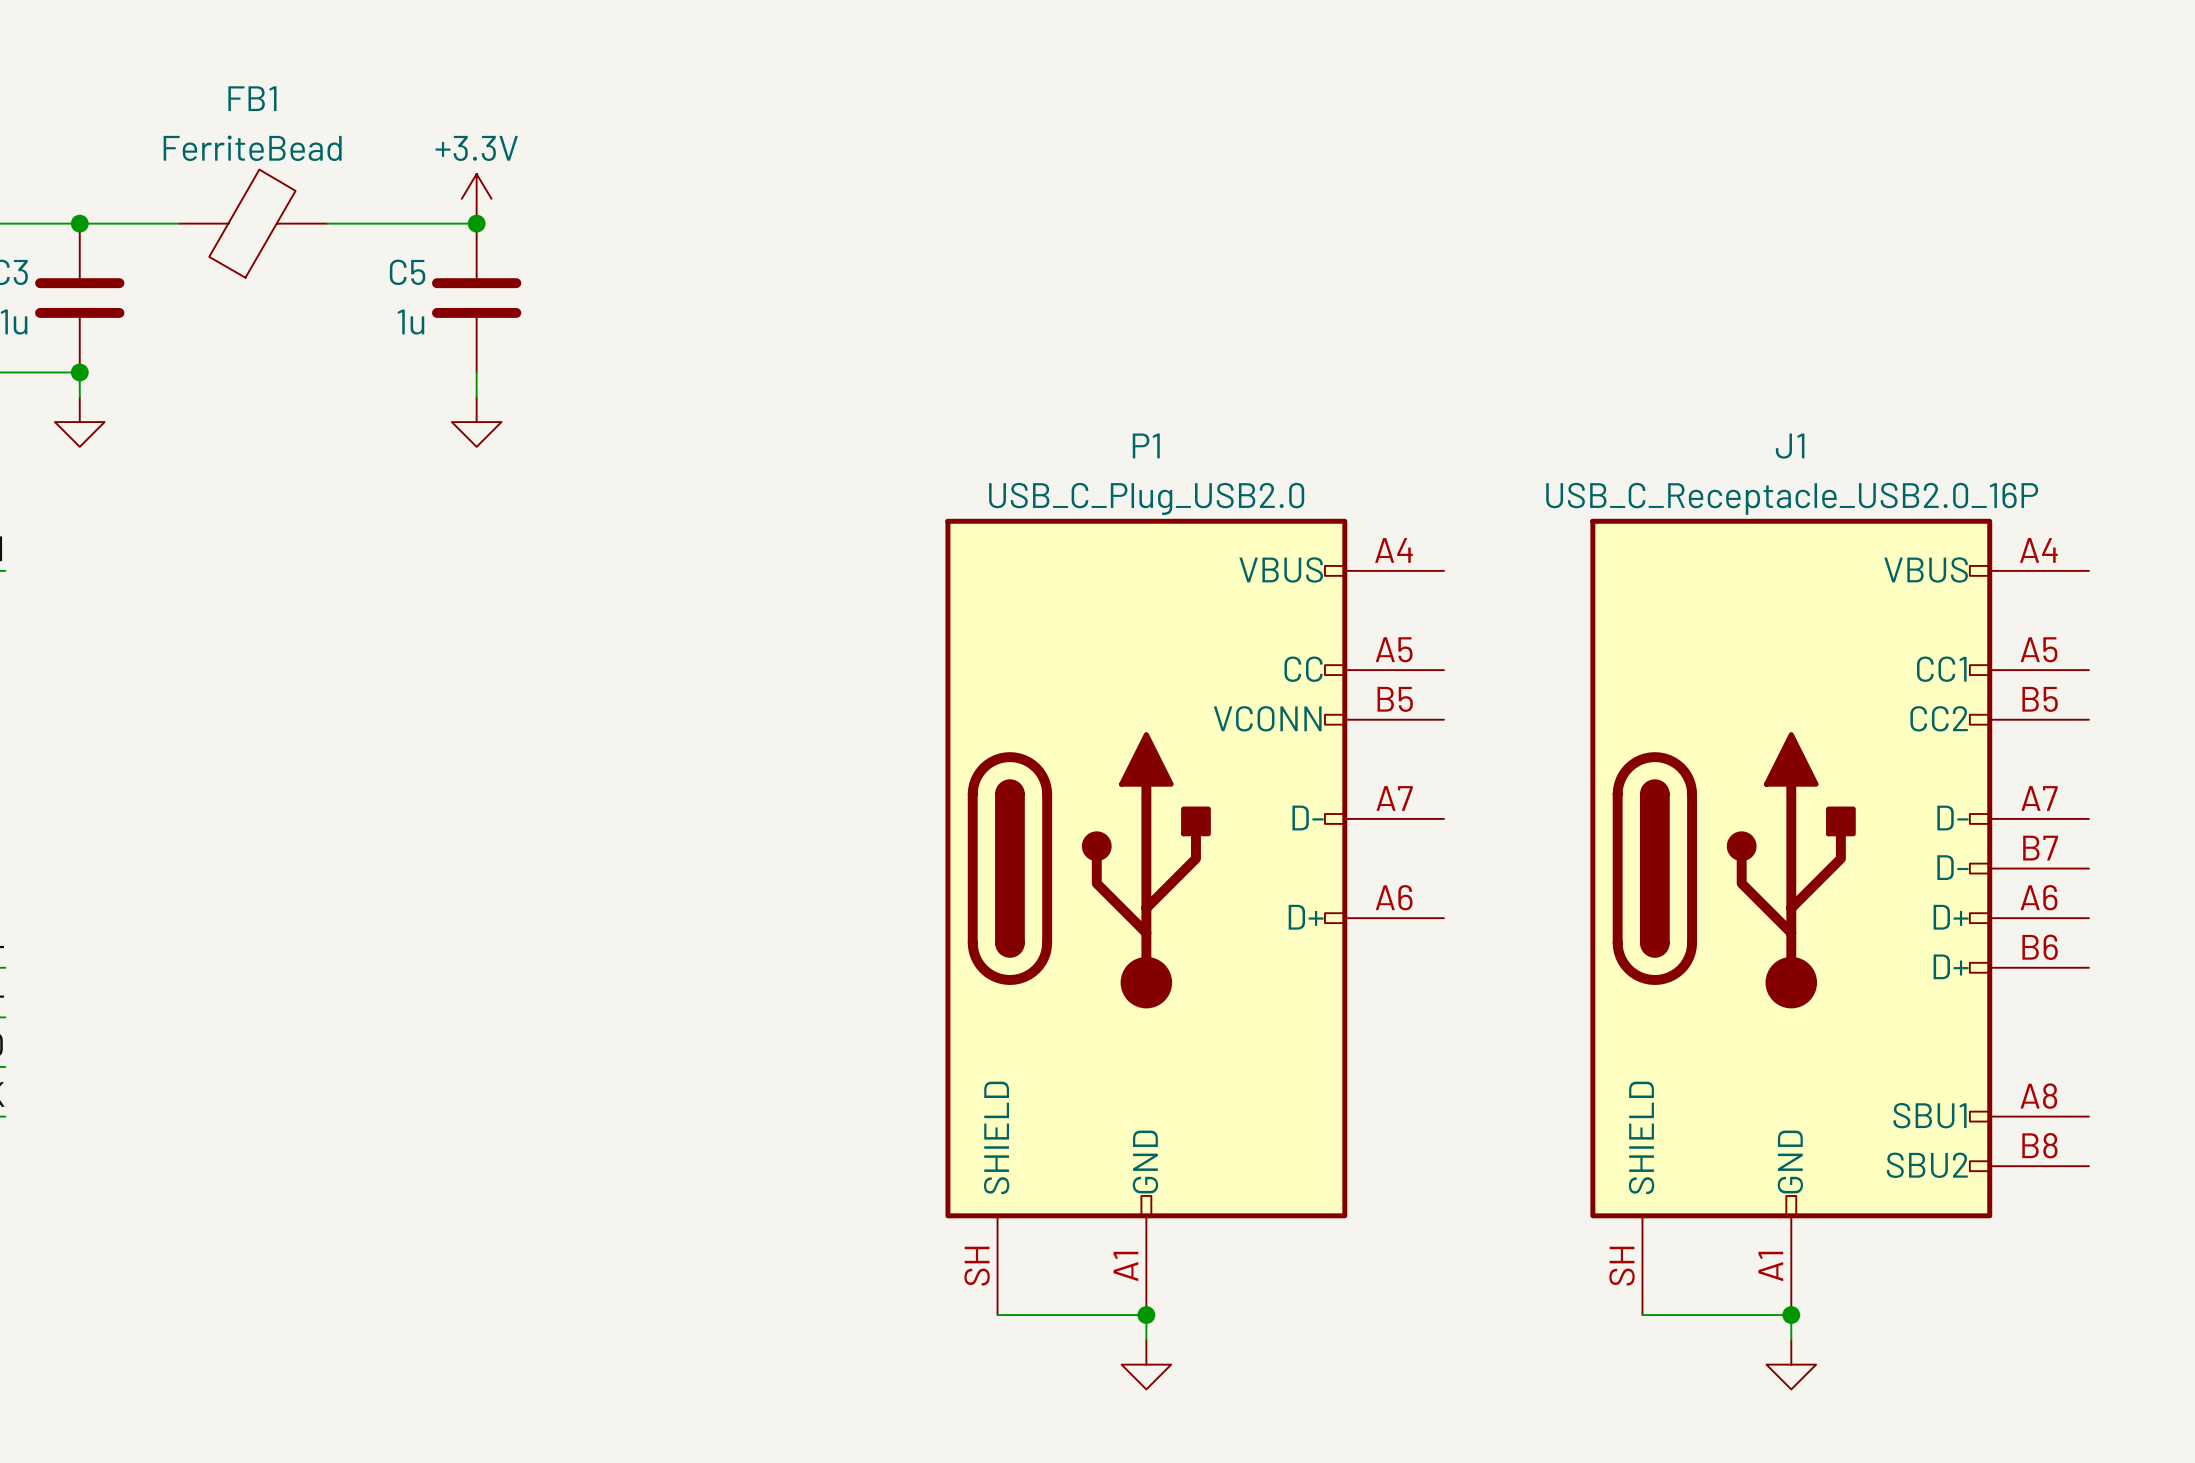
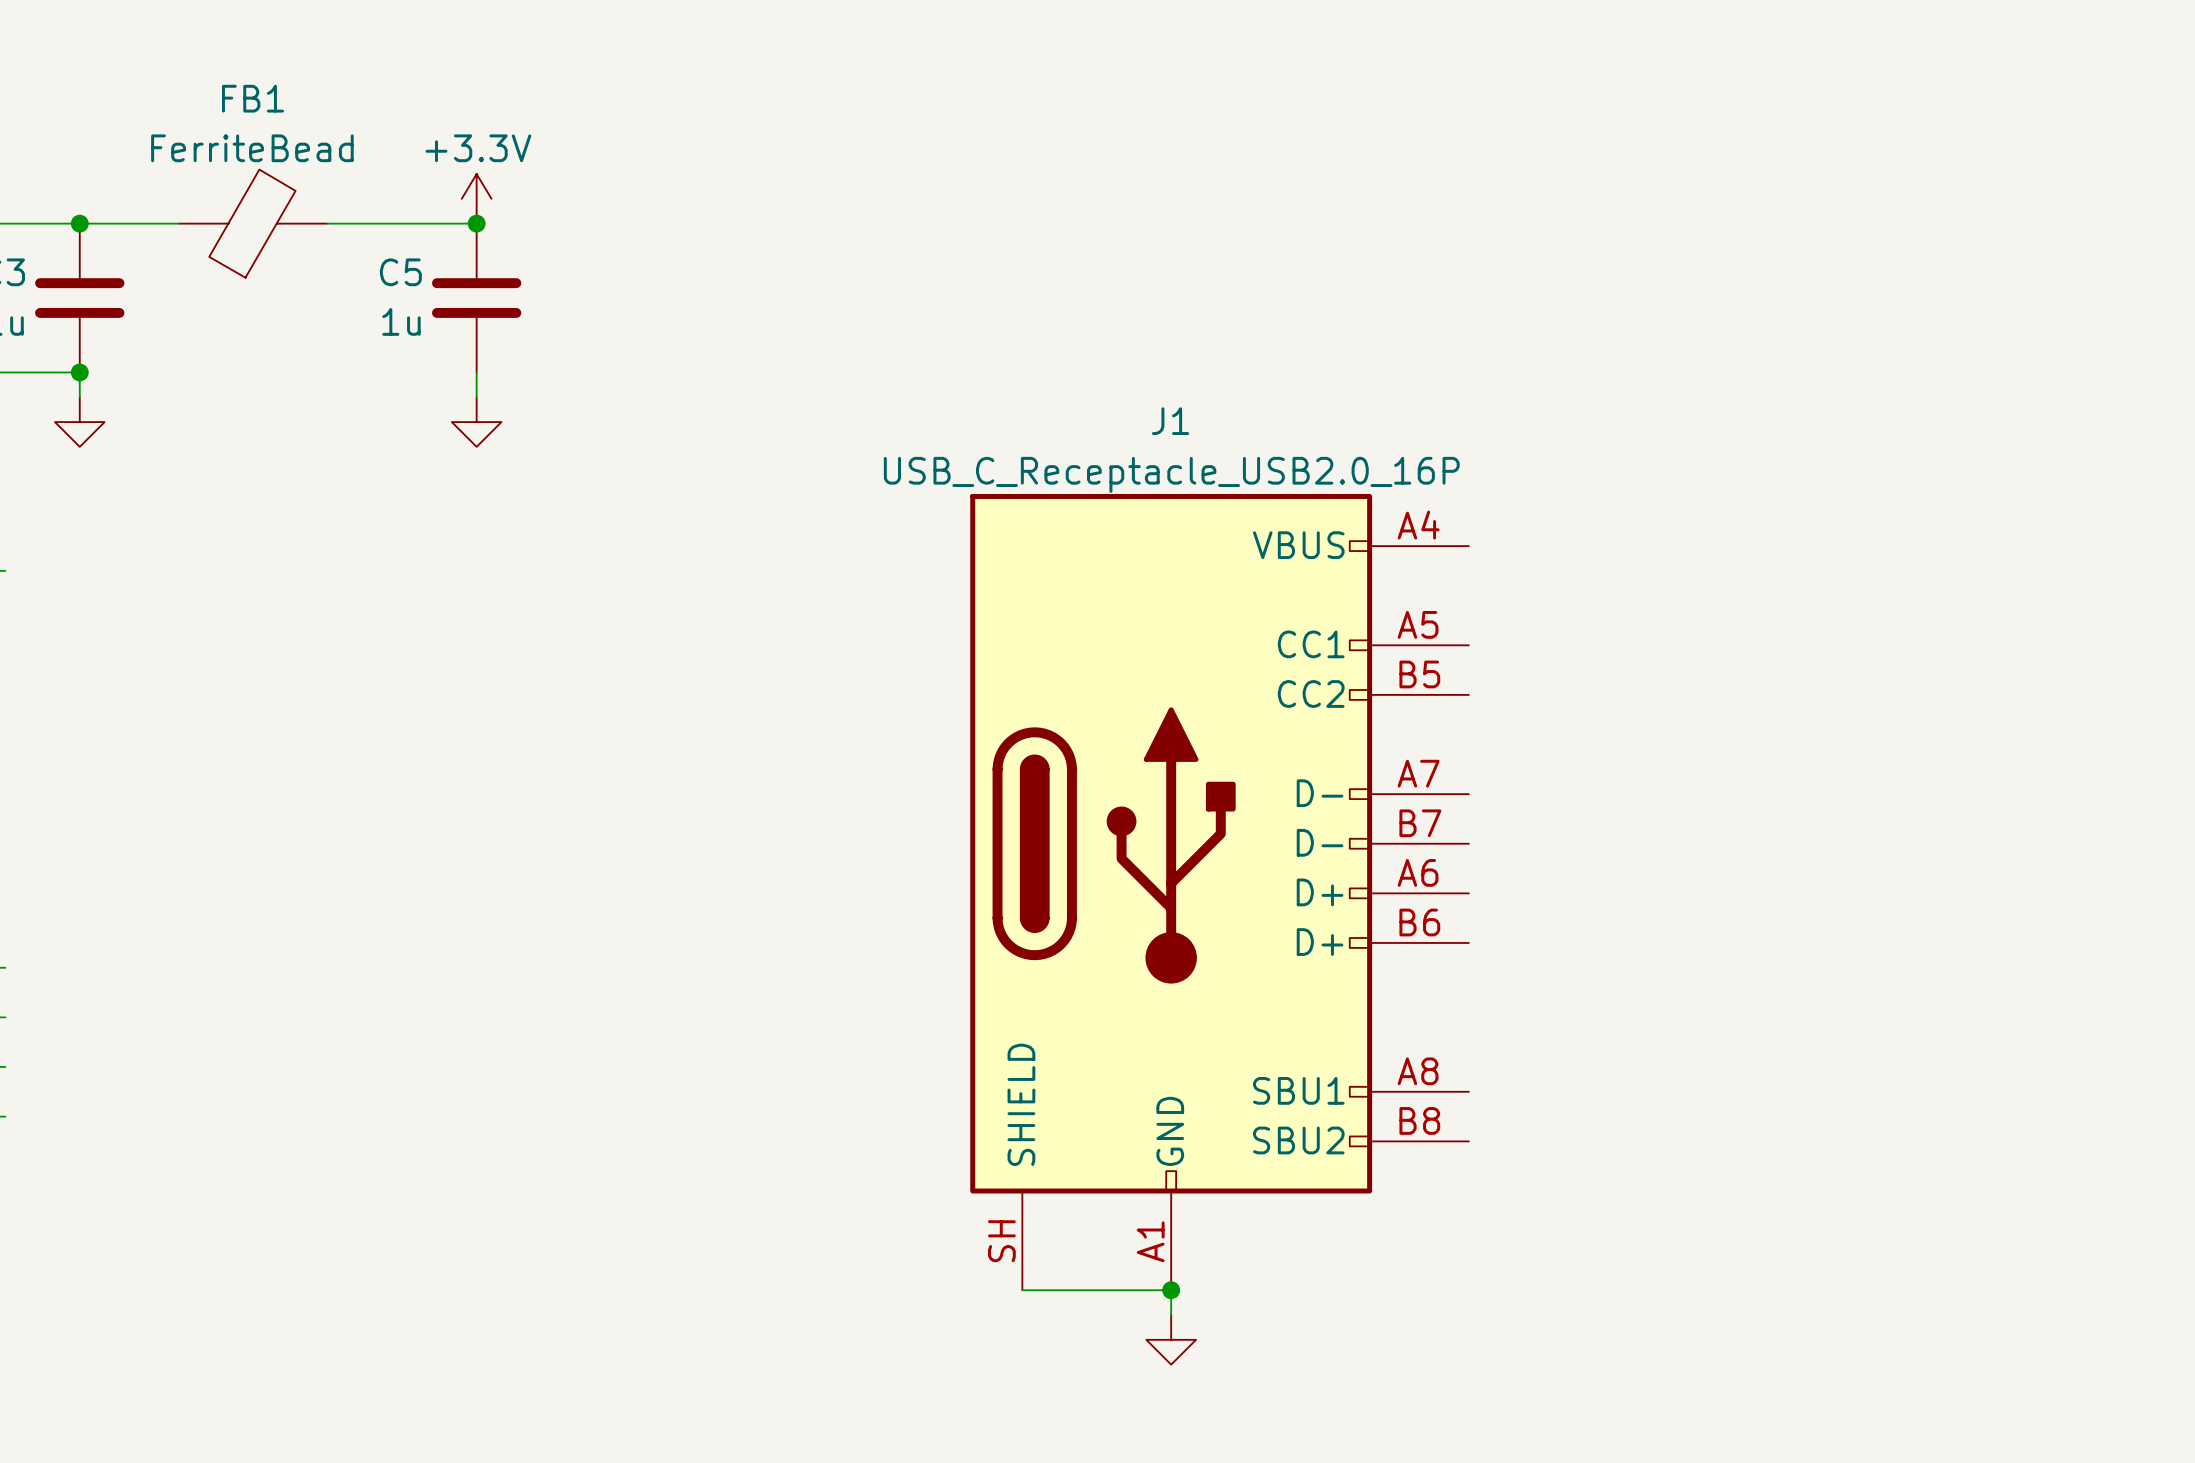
P1: USB_C_Plug_USB2.0 (1194, 916) -> none
J1 position: (1839, 916) -> (1219, 892)
wire: (997, 1315) (1146, 1315) (1146, 1339) -> (1022, 1290) (1171, 1290) (1171, 1315)
junction position: (1146, 1315) -> (1171, 1290)
wire: (1642, 1315) (1791, 1315) (1791, 1339) -> none
junction: (1791, 1315) -> none
power symbol position: (1146, 1364) -> (1171, 1339)
power symbol: (1791, 1364) -> none

